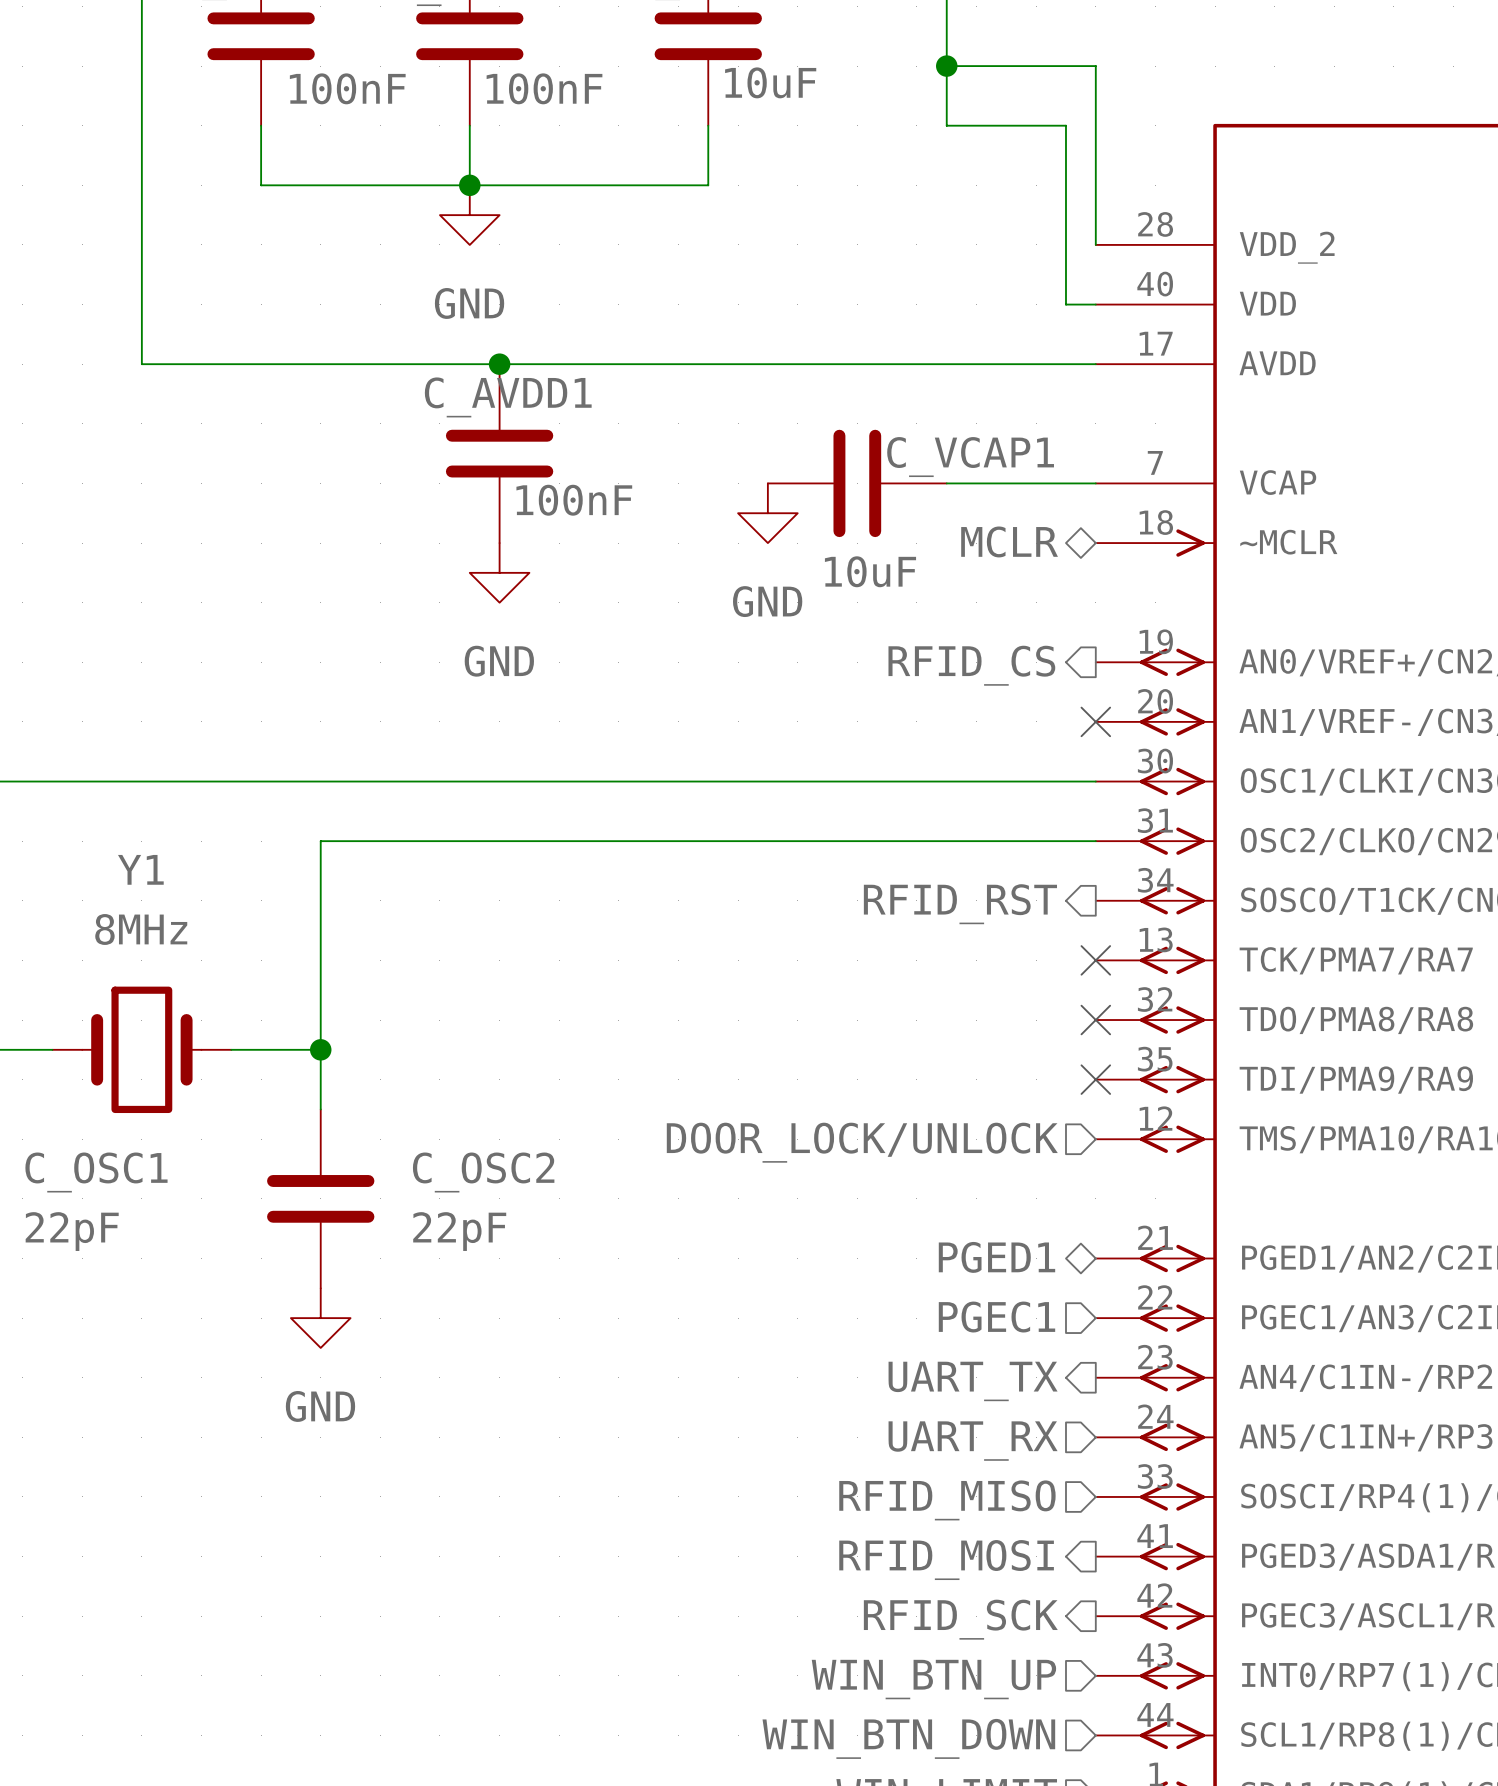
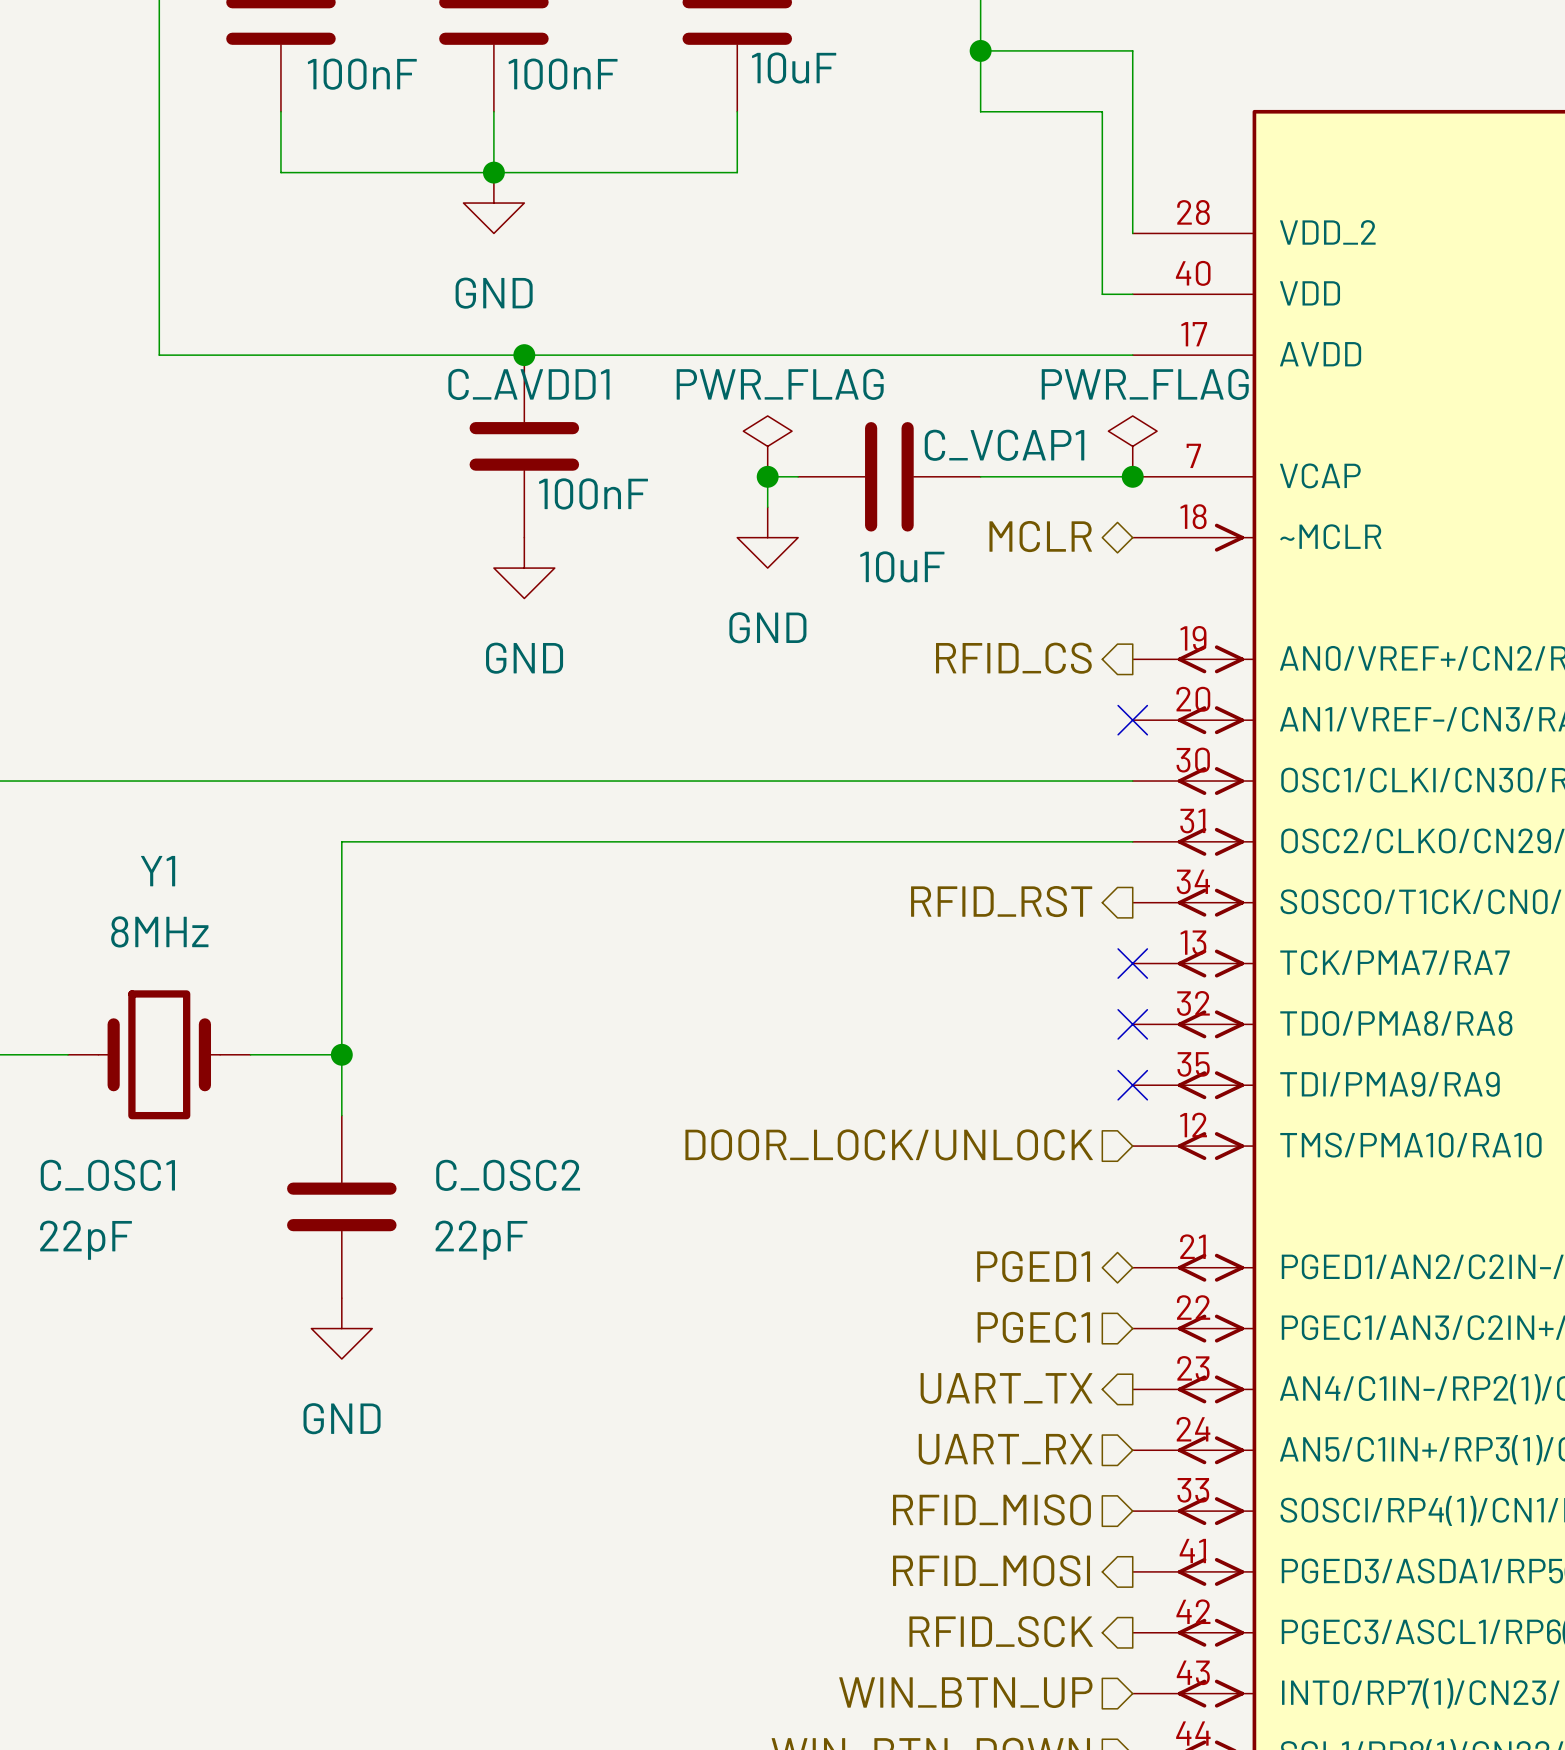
power symbol: none -> PWR_FLAG (767, 446)
power symbol: none -> PWR_FLAG (1132, 446)
junction: none -> (767, 476)
wire: none -> (798, 476) (767, 476) (767, 507)
junction: none -> (1132, 476)
power symbol position: GND (767, 513) -> GND (767, 537)

